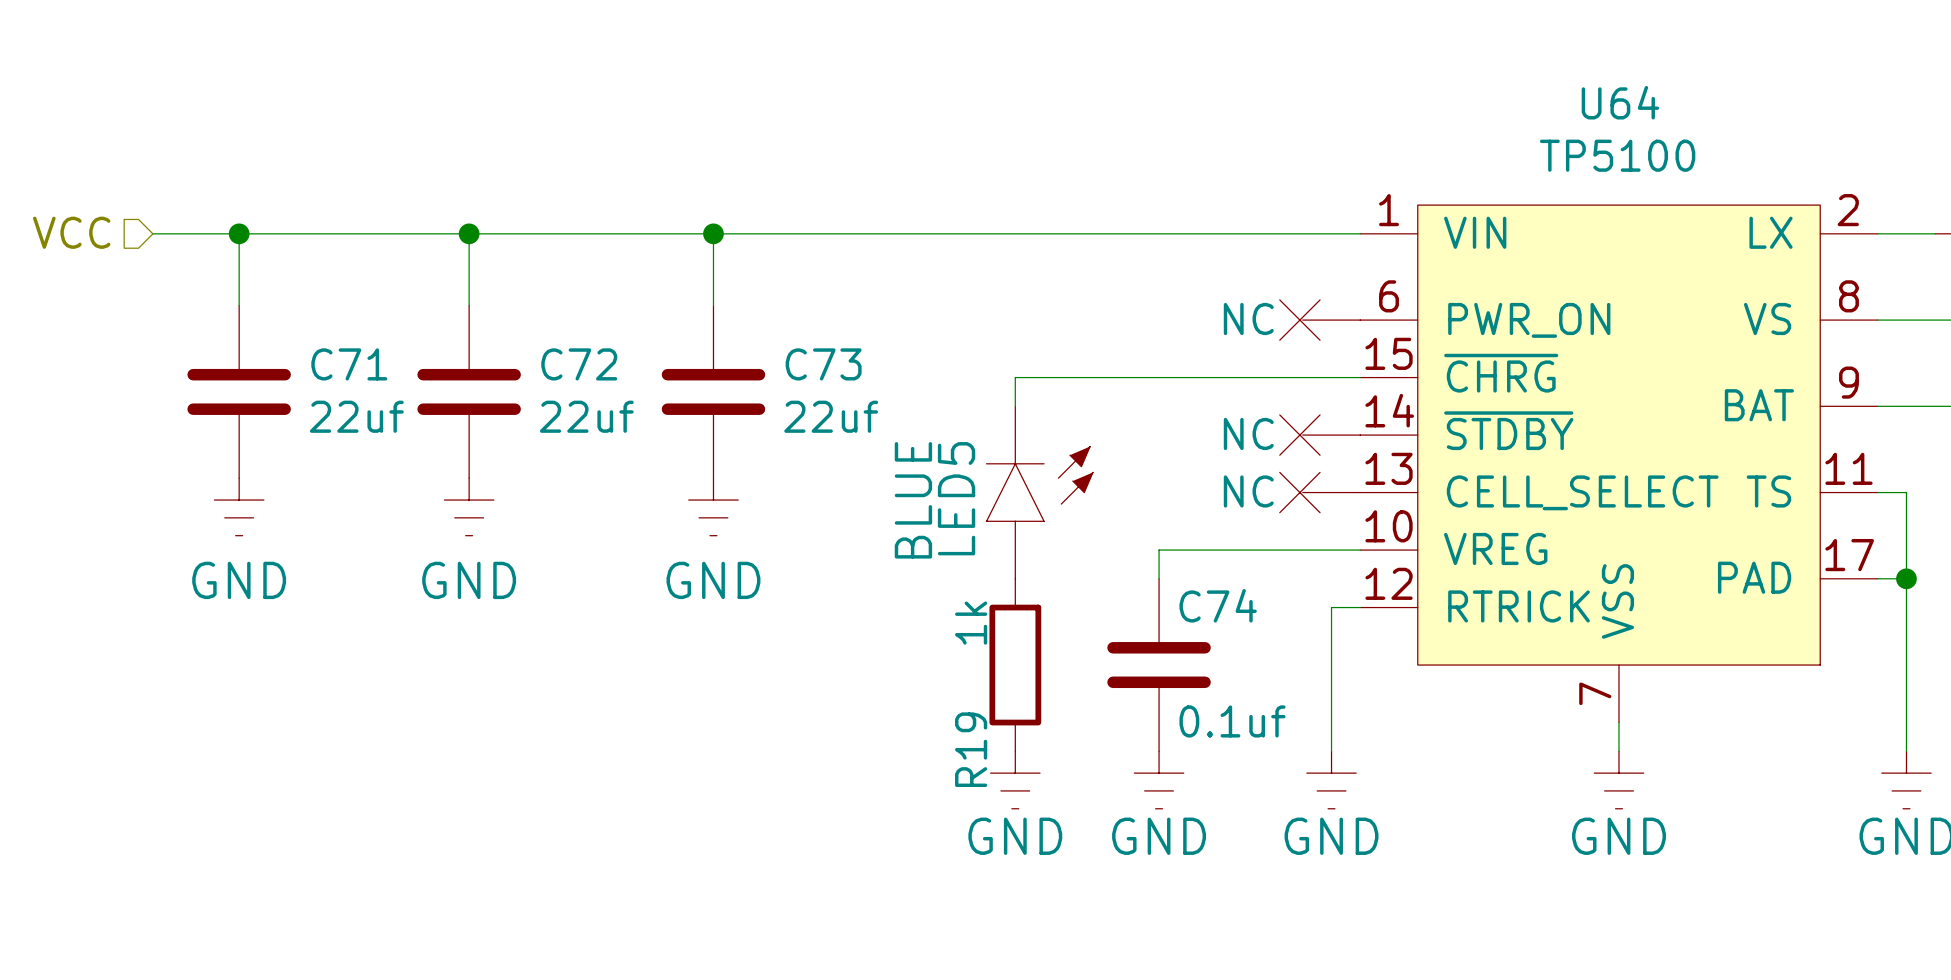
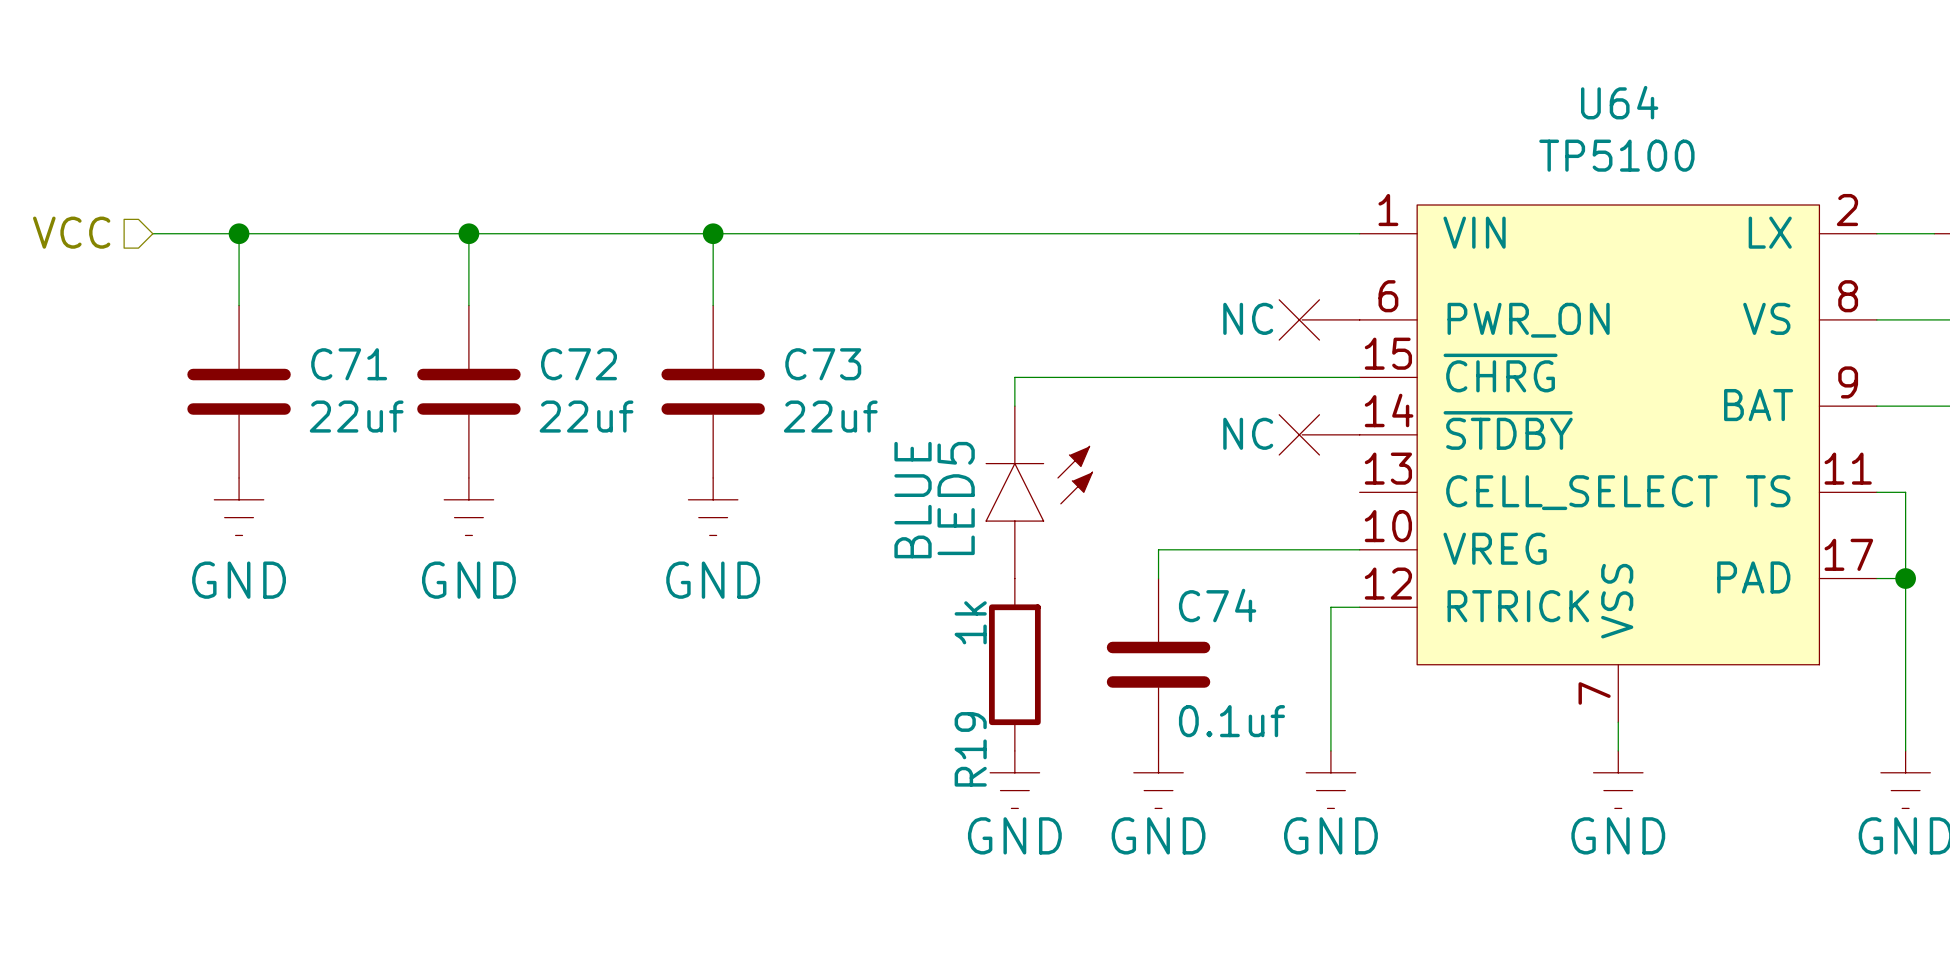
power symbol: (1320, 492) -> none

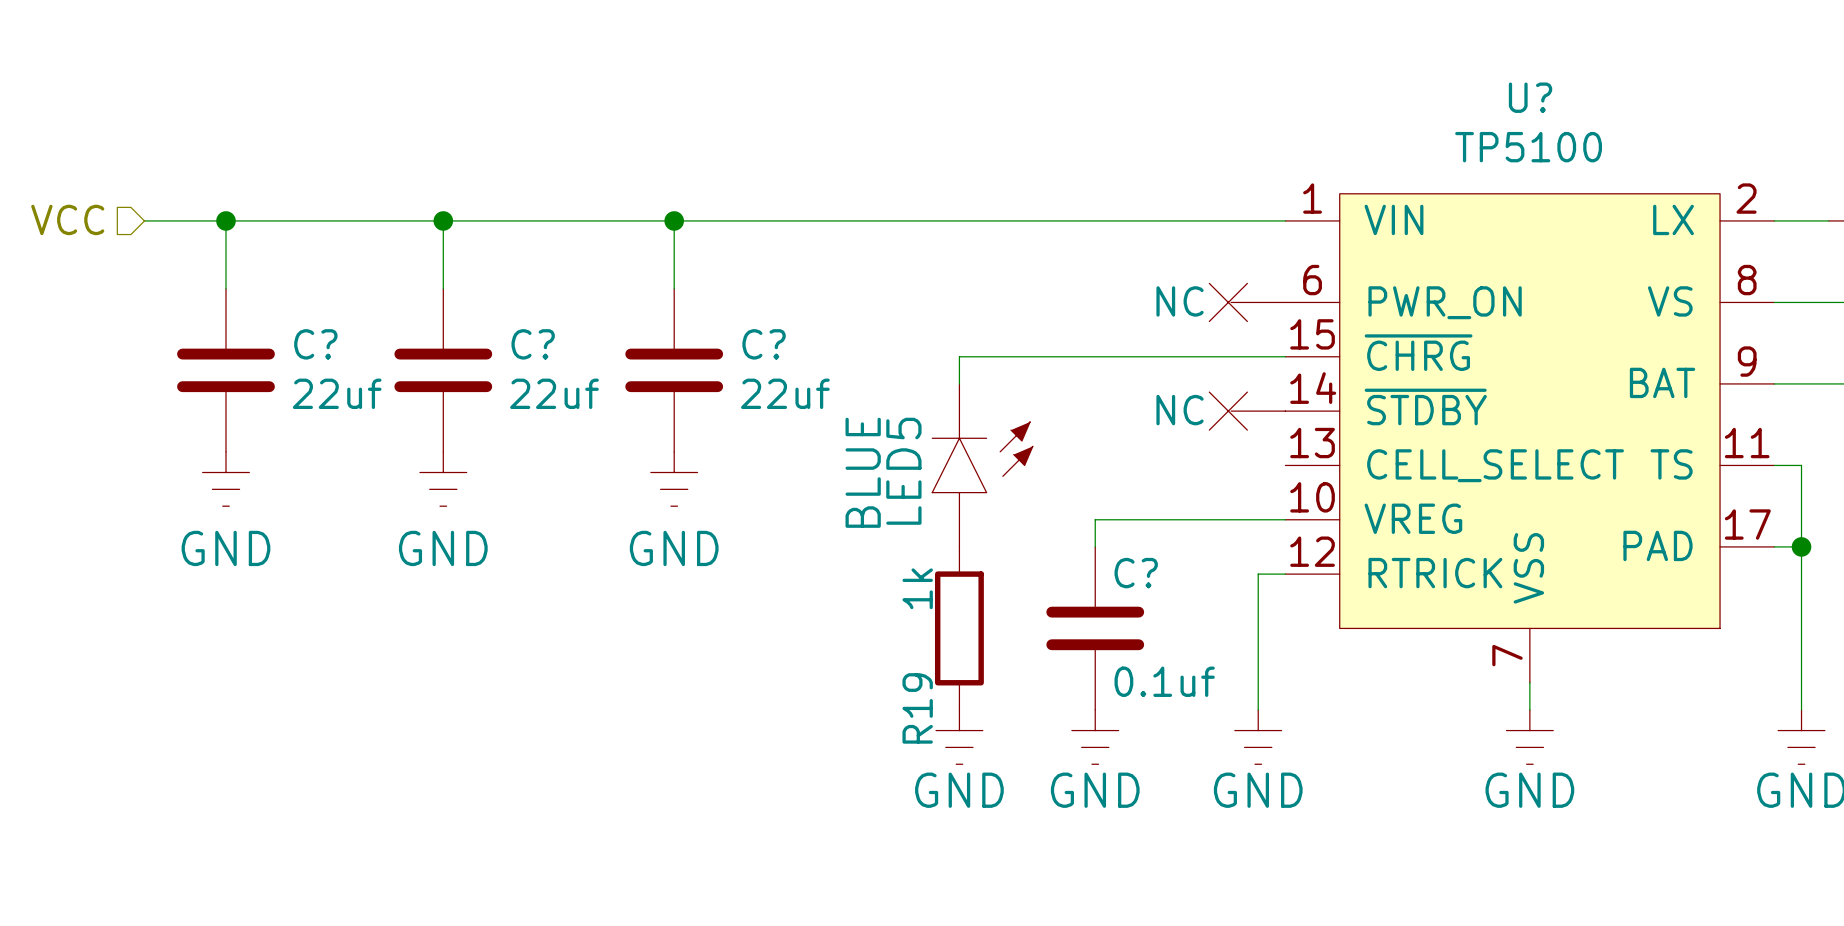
U64 name: U64 (1619, 102) -> U? (1530, 97)
C71 name: C71 (349, 364) -> C? (315, 344)
C72 name: C72 (579, 364) -> C? (533, 344)
C73 name: C73 (823, 364) -> C? (764, 344)
C74 name: C74 (1217, 605) -> C? (1136, 573)

